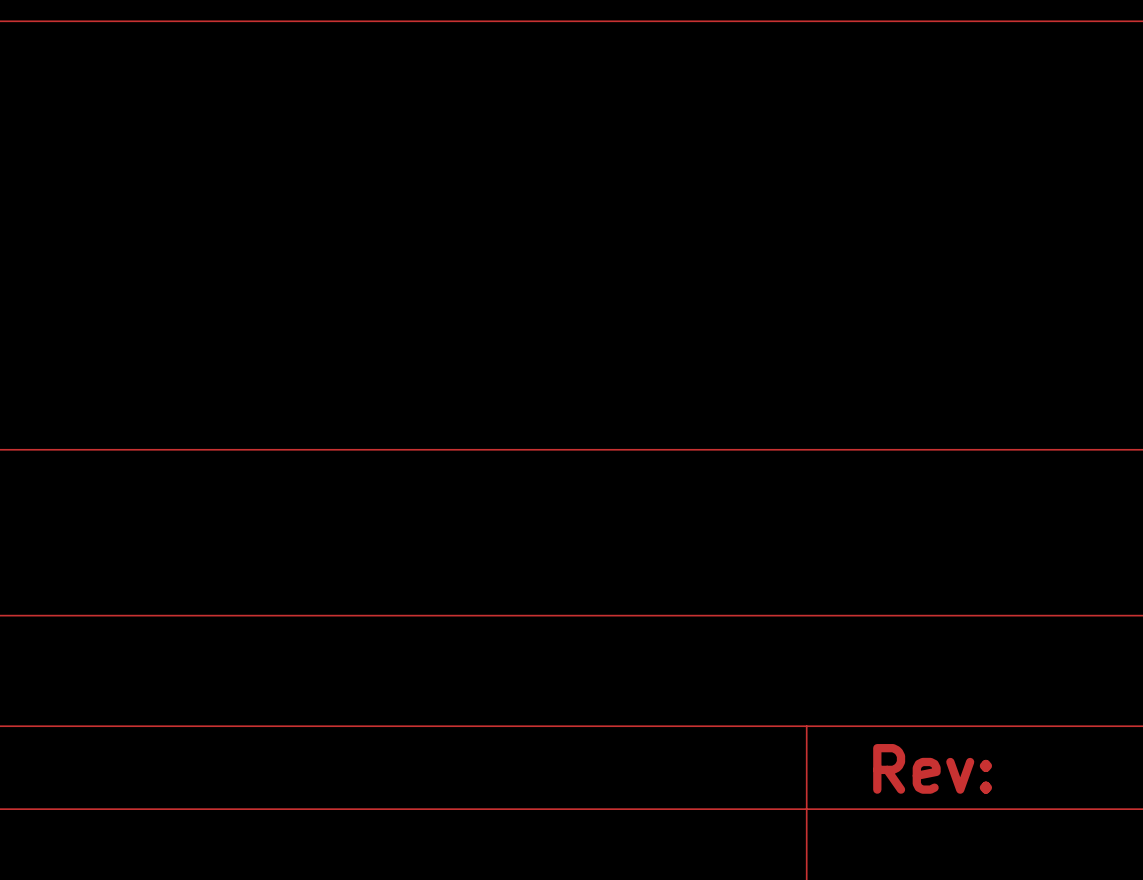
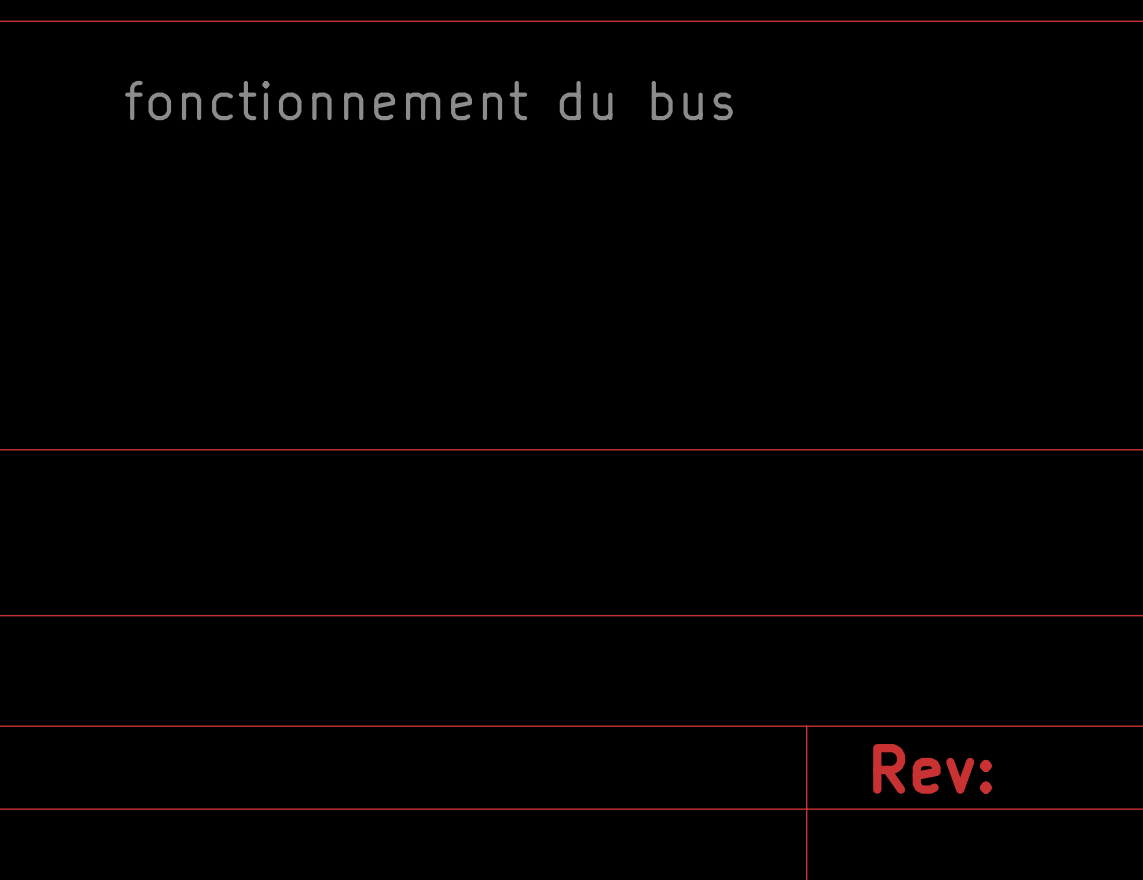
text: none -> fonctionnement du bus (428, 100)

